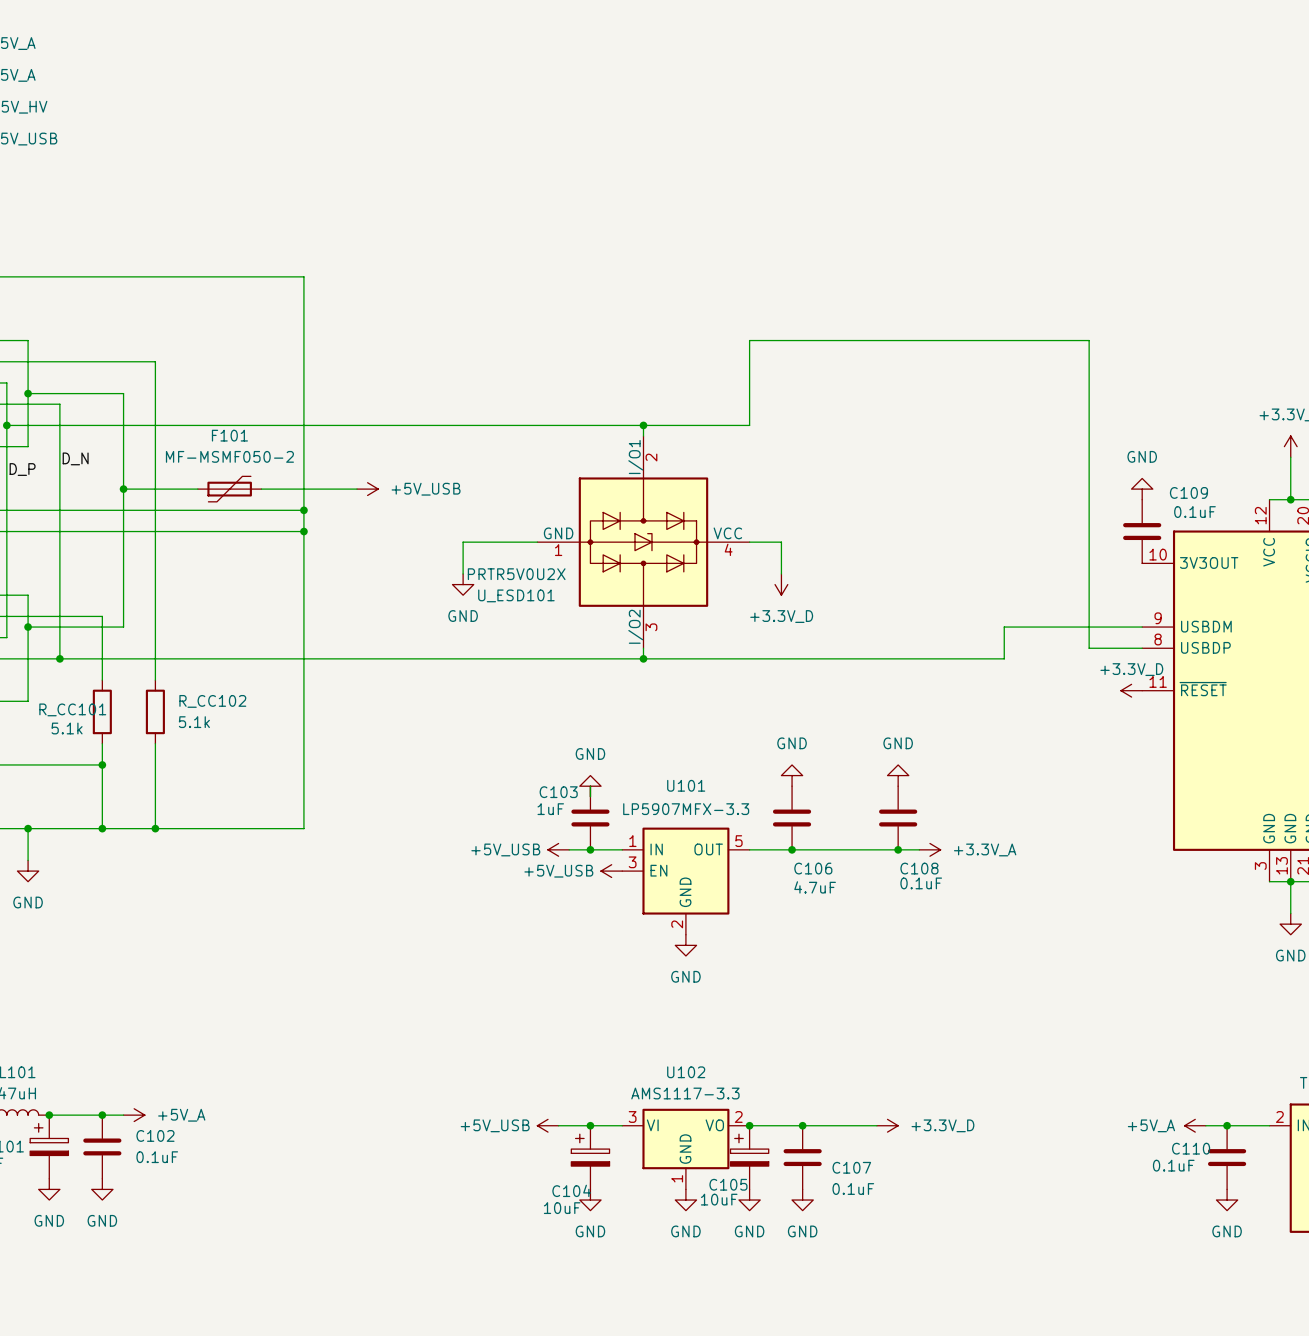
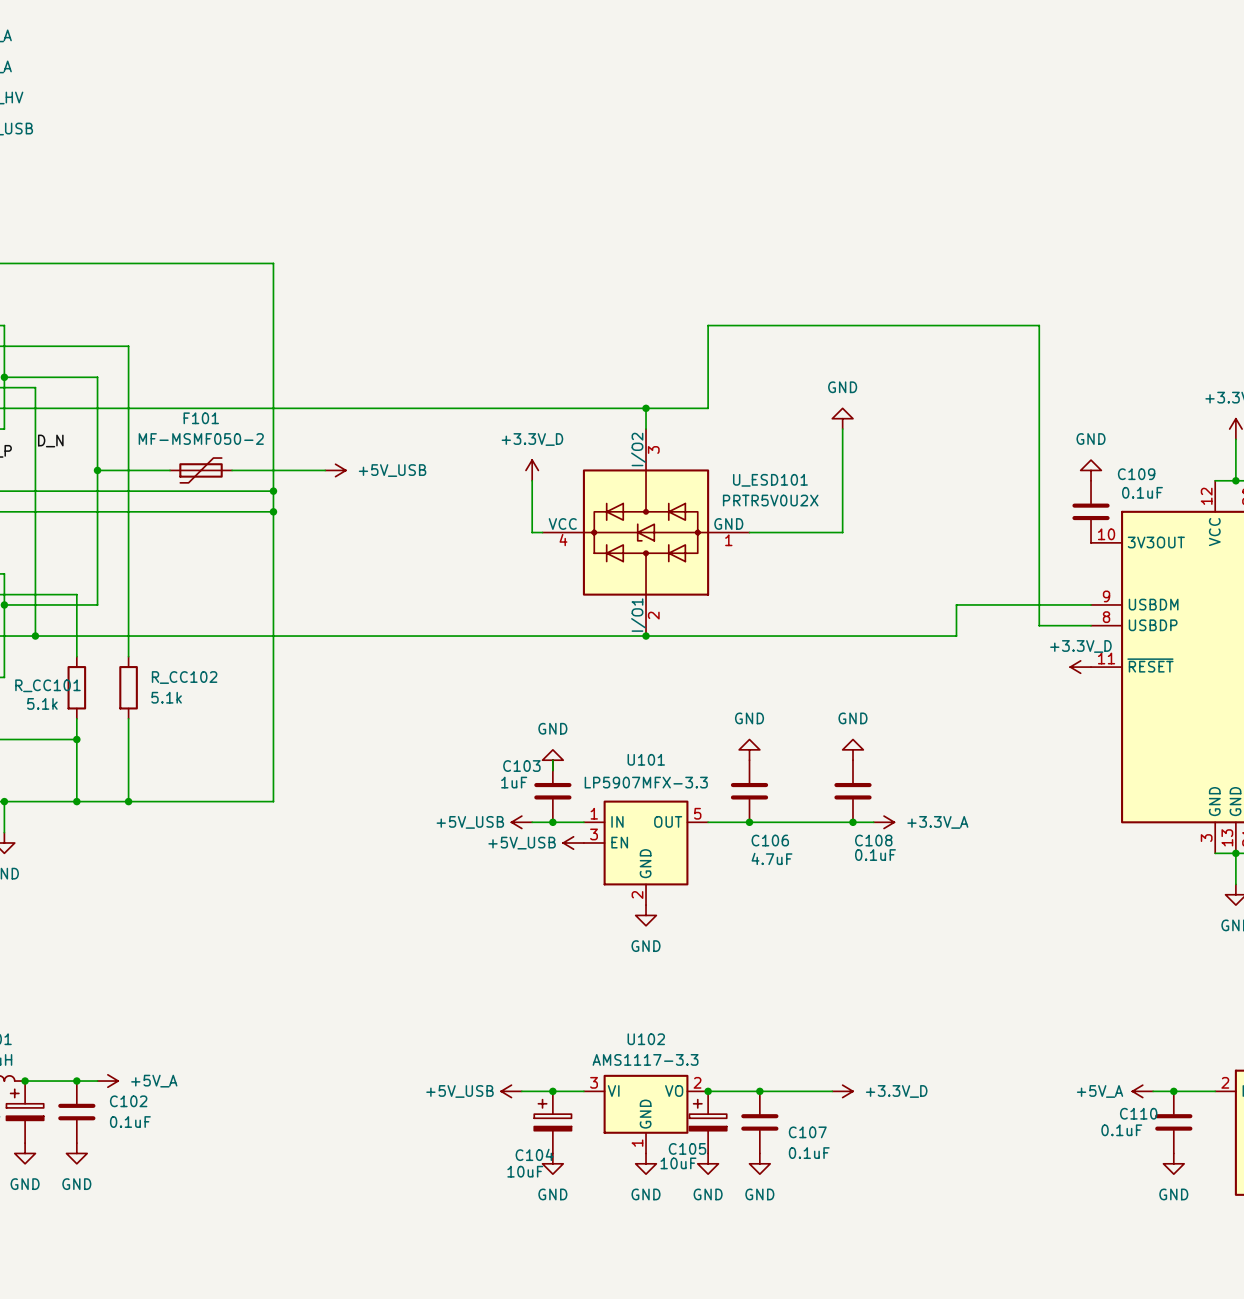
wire: (643, 425) (643, 436) -> none
junction position: (643, 425) -> (646, 408)
wire: none -> (646, 408) (646, 429)
power symbol: none -> GND (842, 418)
wire: none -> (842, 429) (842, 532) (749, 532)
power symbol: none -> +3.3V_D (532, 470)
wire: none -> (532, 480) (532, 532) (542, 532)
wire: (537, 542) (463, 542) (463, 573) -> none
U_ESD101 rotation: 0° (643, 542) -> 180° (646, 532)
wire: (749, 542) (781, 542) (781, 573) -> none
power symbol: GND (463, 584) -> none
power symbol: +3.3V_D (781, 584) -> none
wire: (643, 648) (643, 658) -> none
junction position: (643, 658) -> (646, 636)

